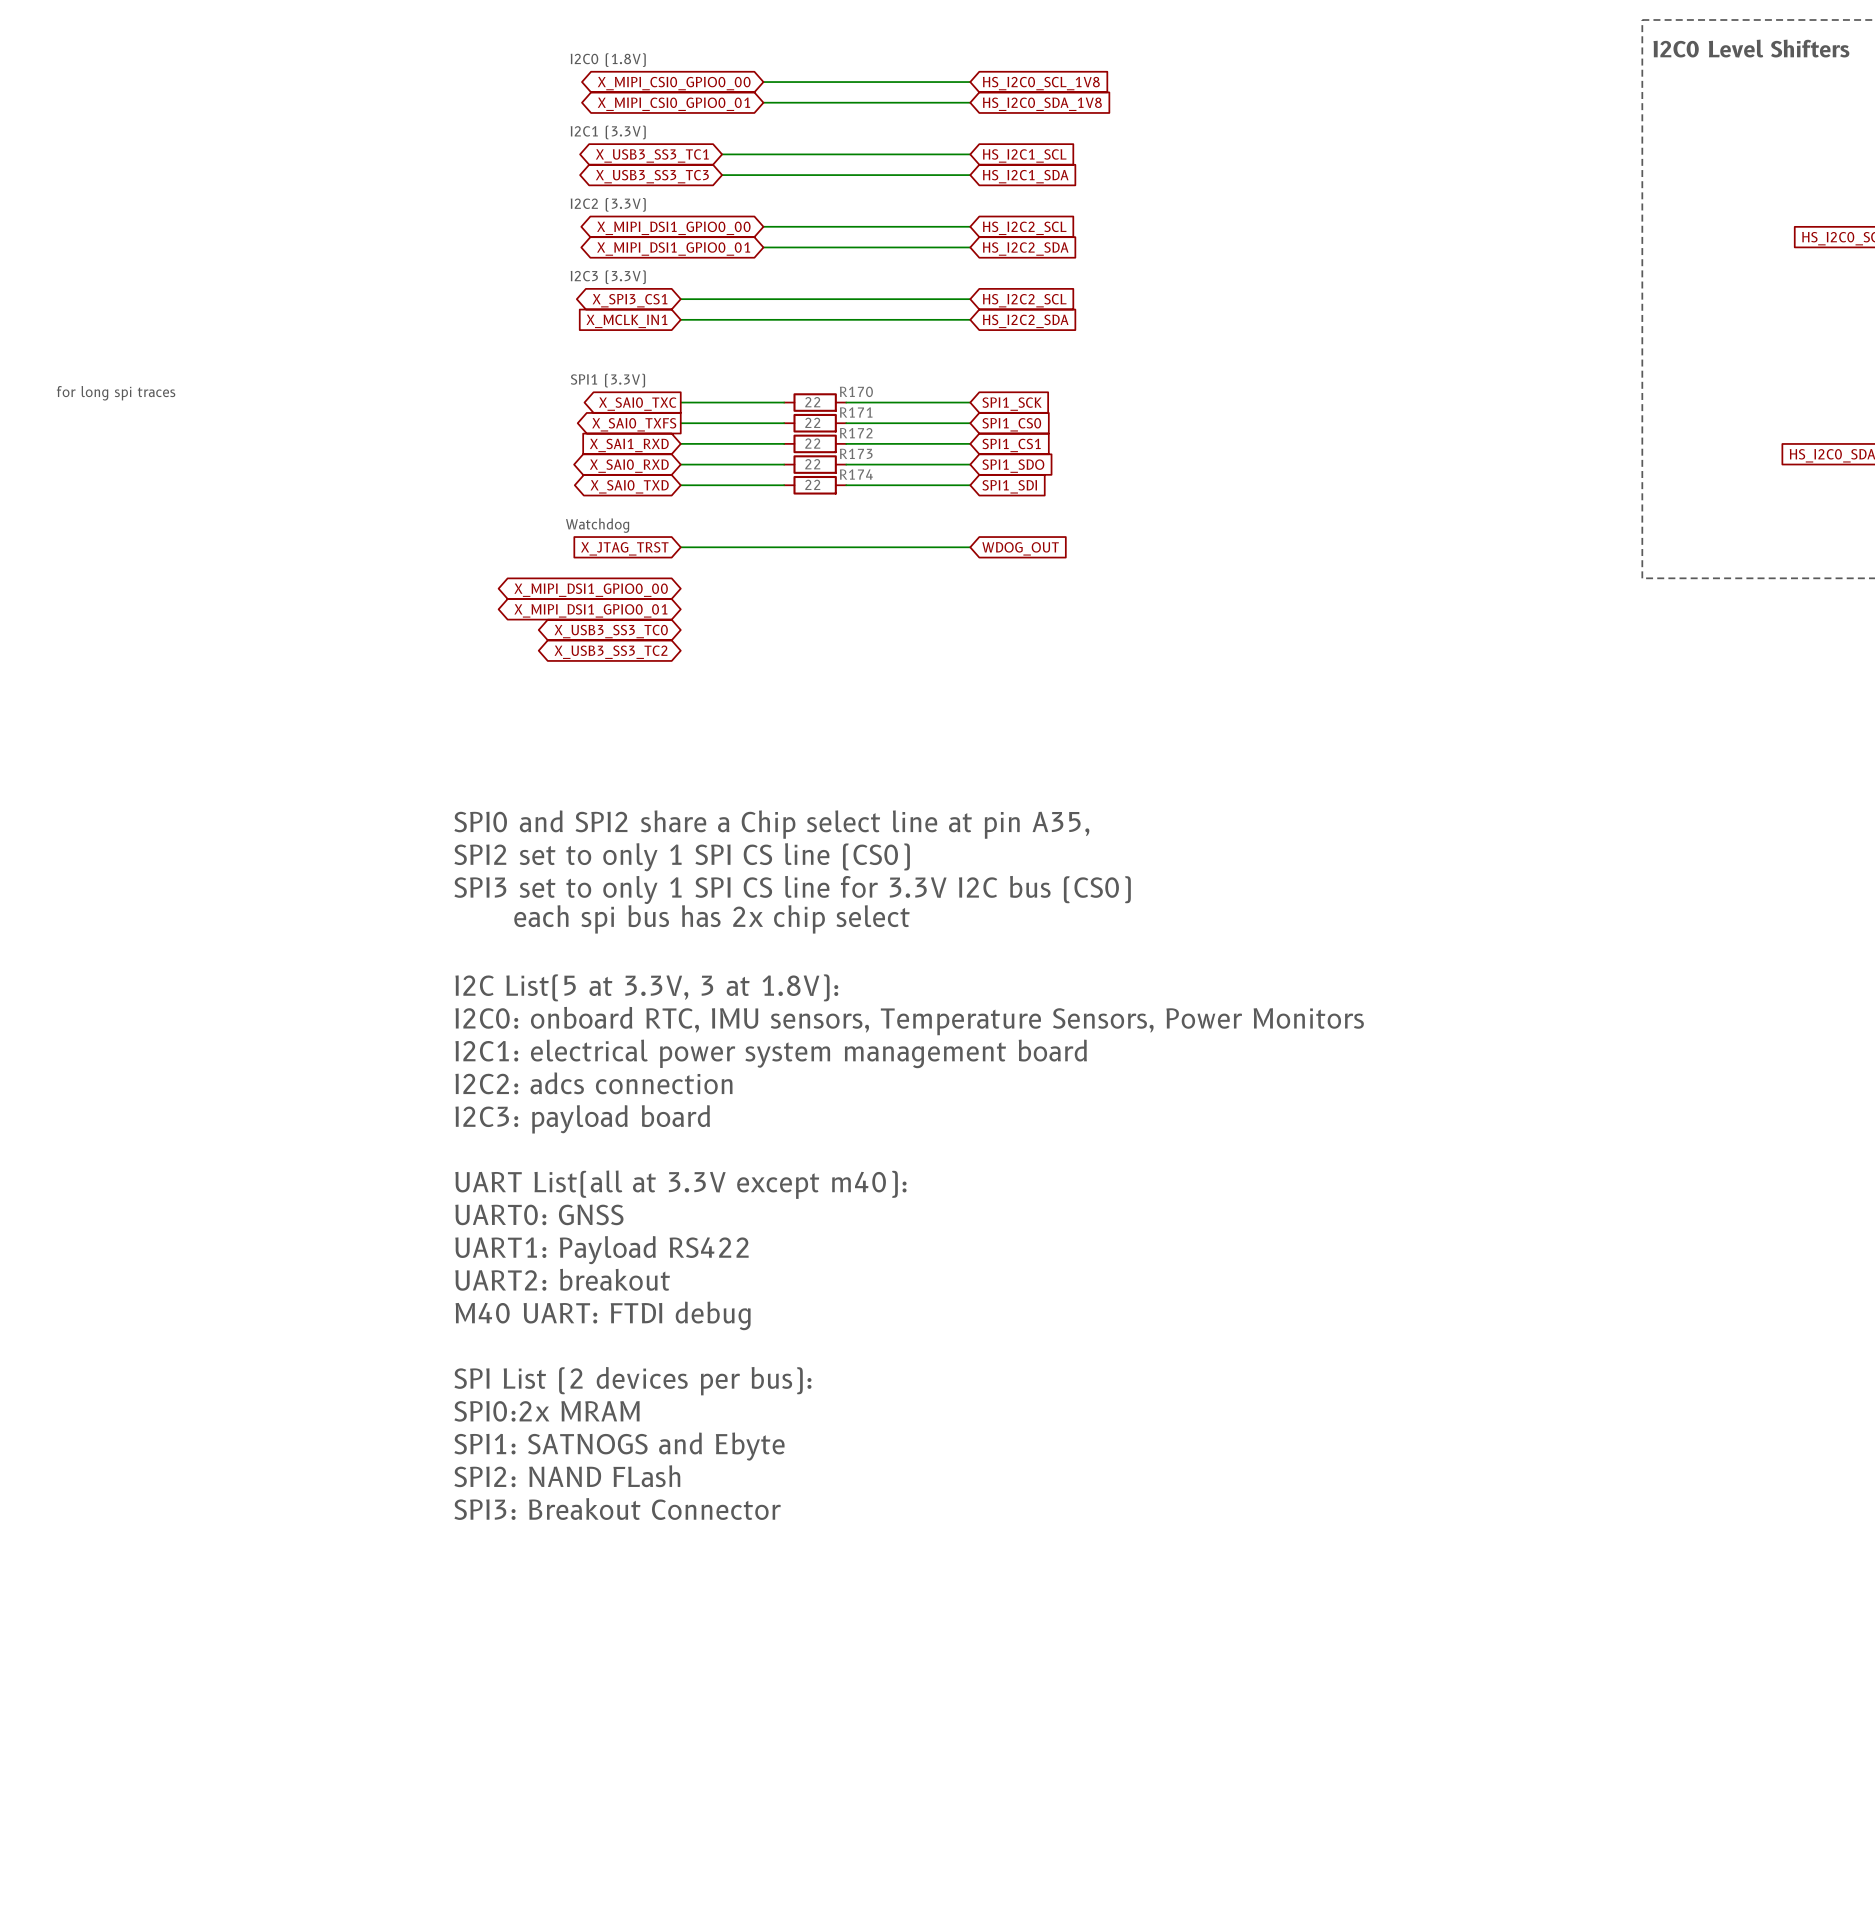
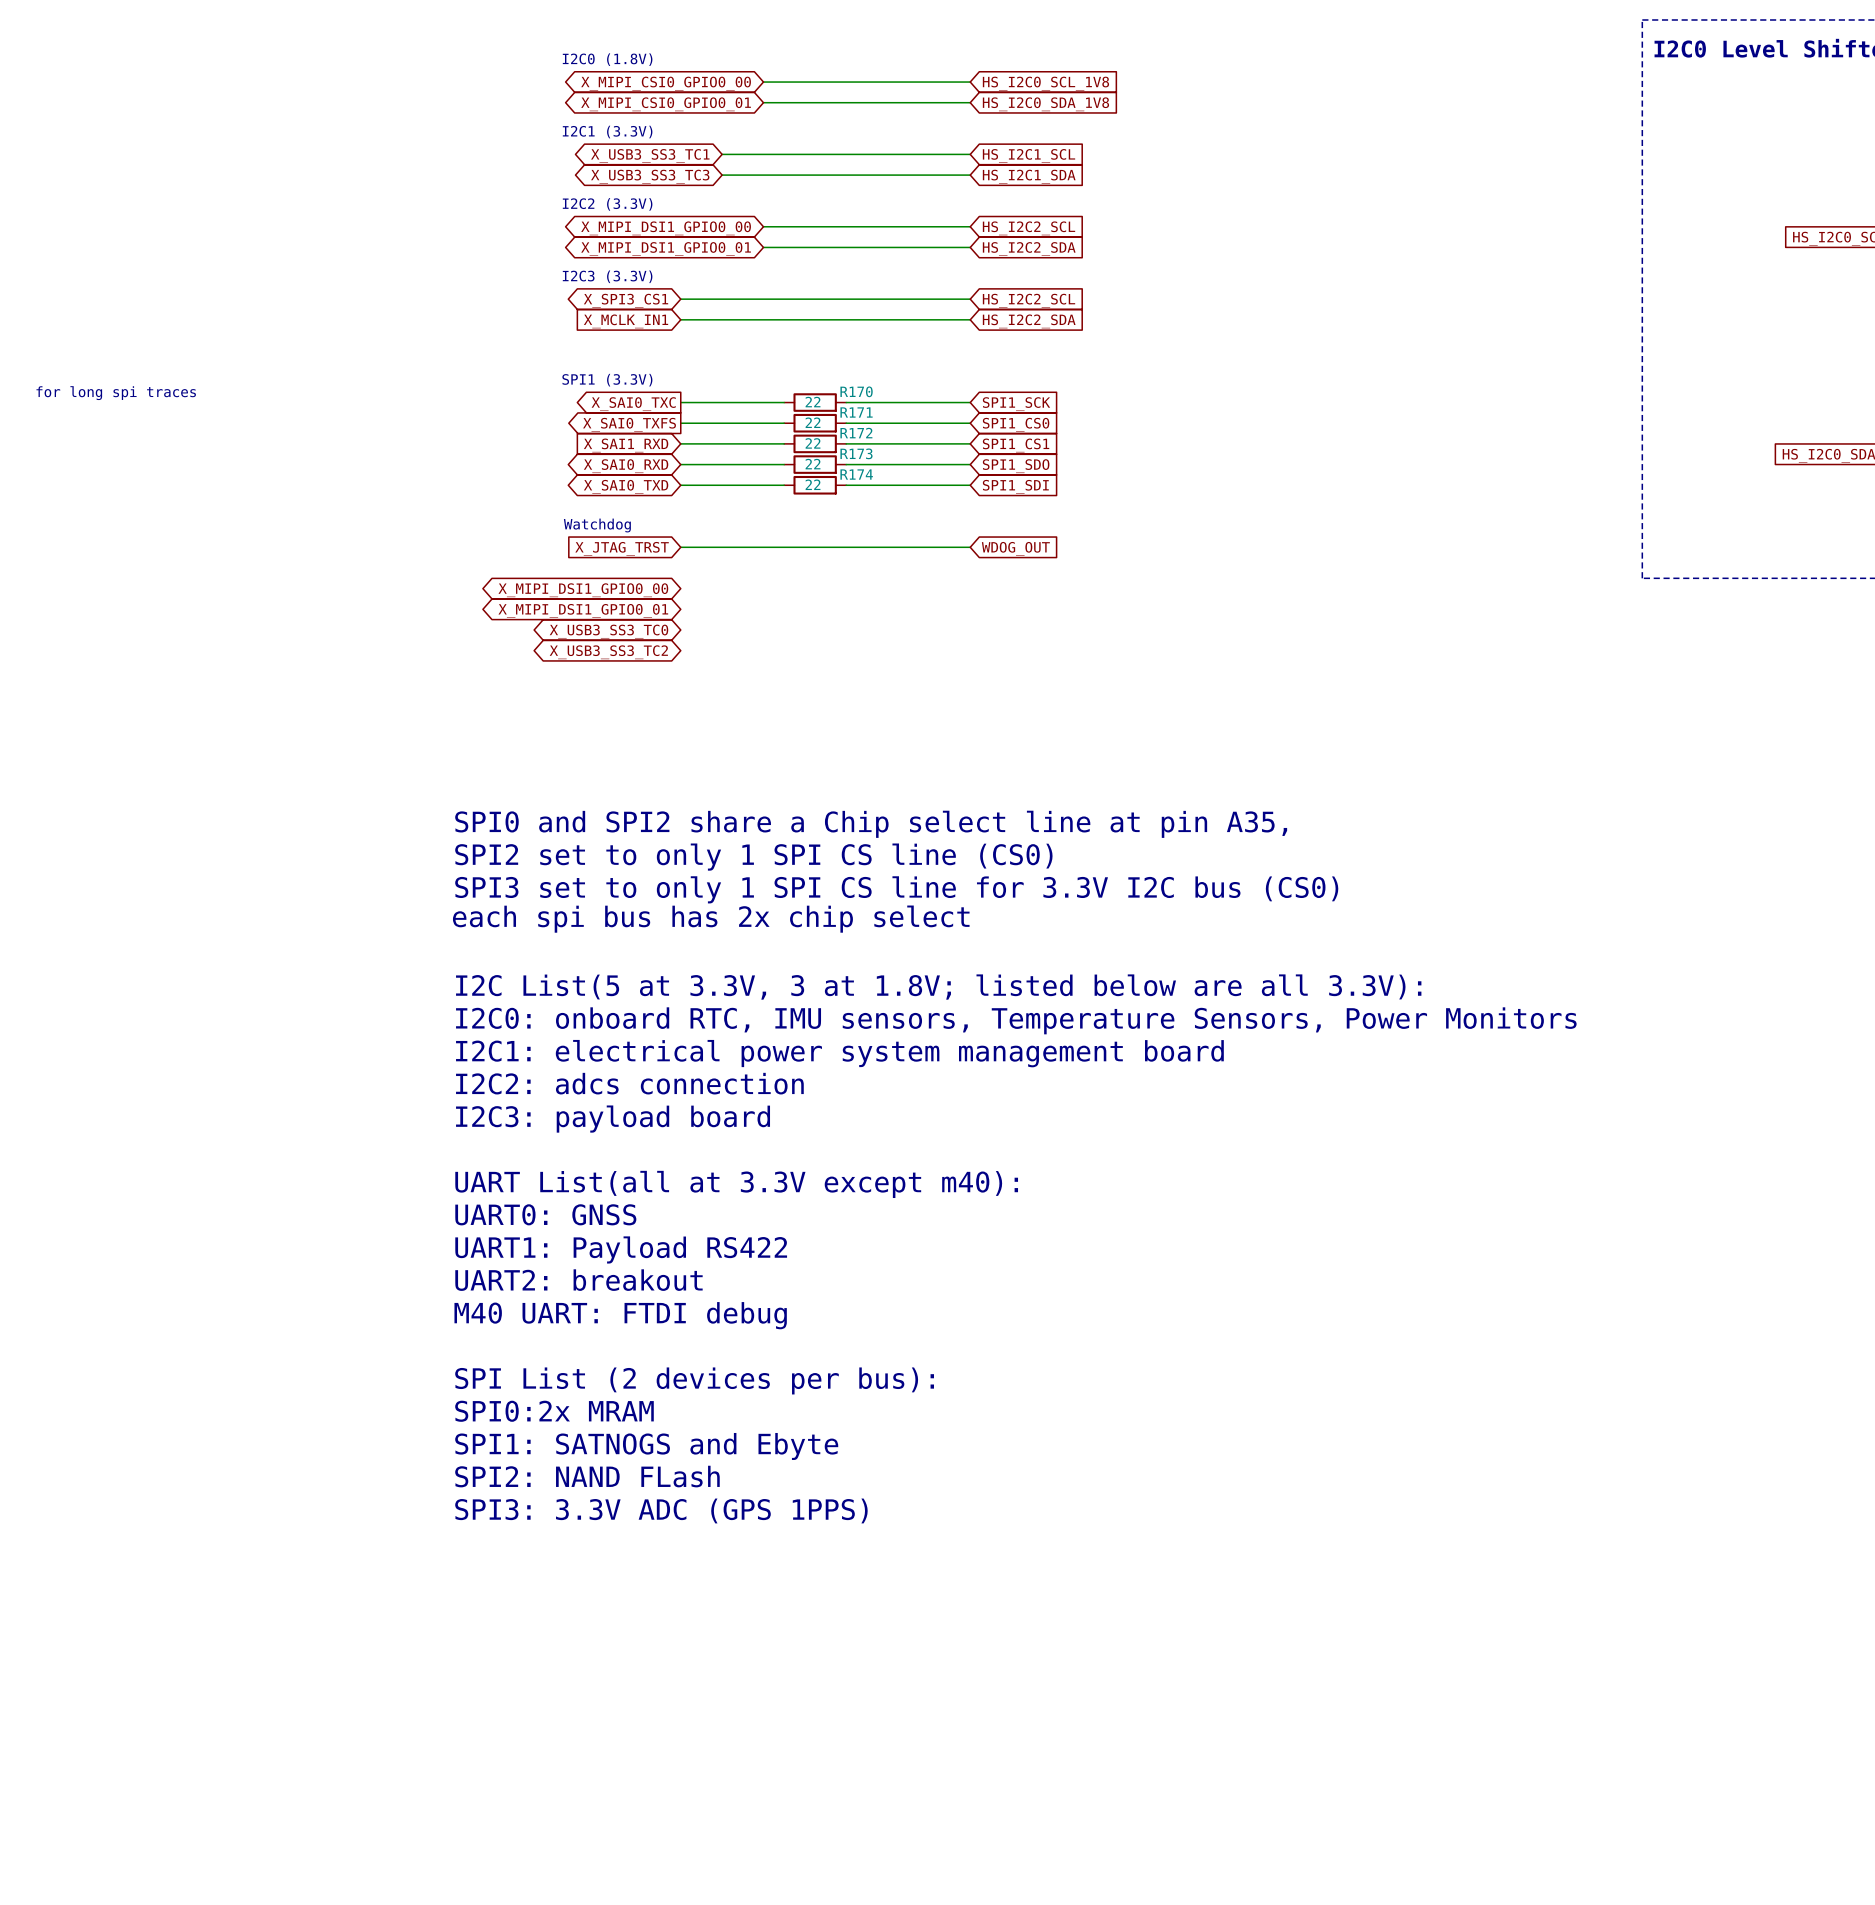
text: I2C List(5 at 3.3V, 3 at 1.8V): (646, 987) -> I2C List(5 at 3.3V, 3 at 1.8V; listed below are all 3.3V): (938, 987)
text: SPI3: Breakout Connector (617, 1508) -> SPI3: 3.3V ADC (GPS 1PPS) (661, 1510)

